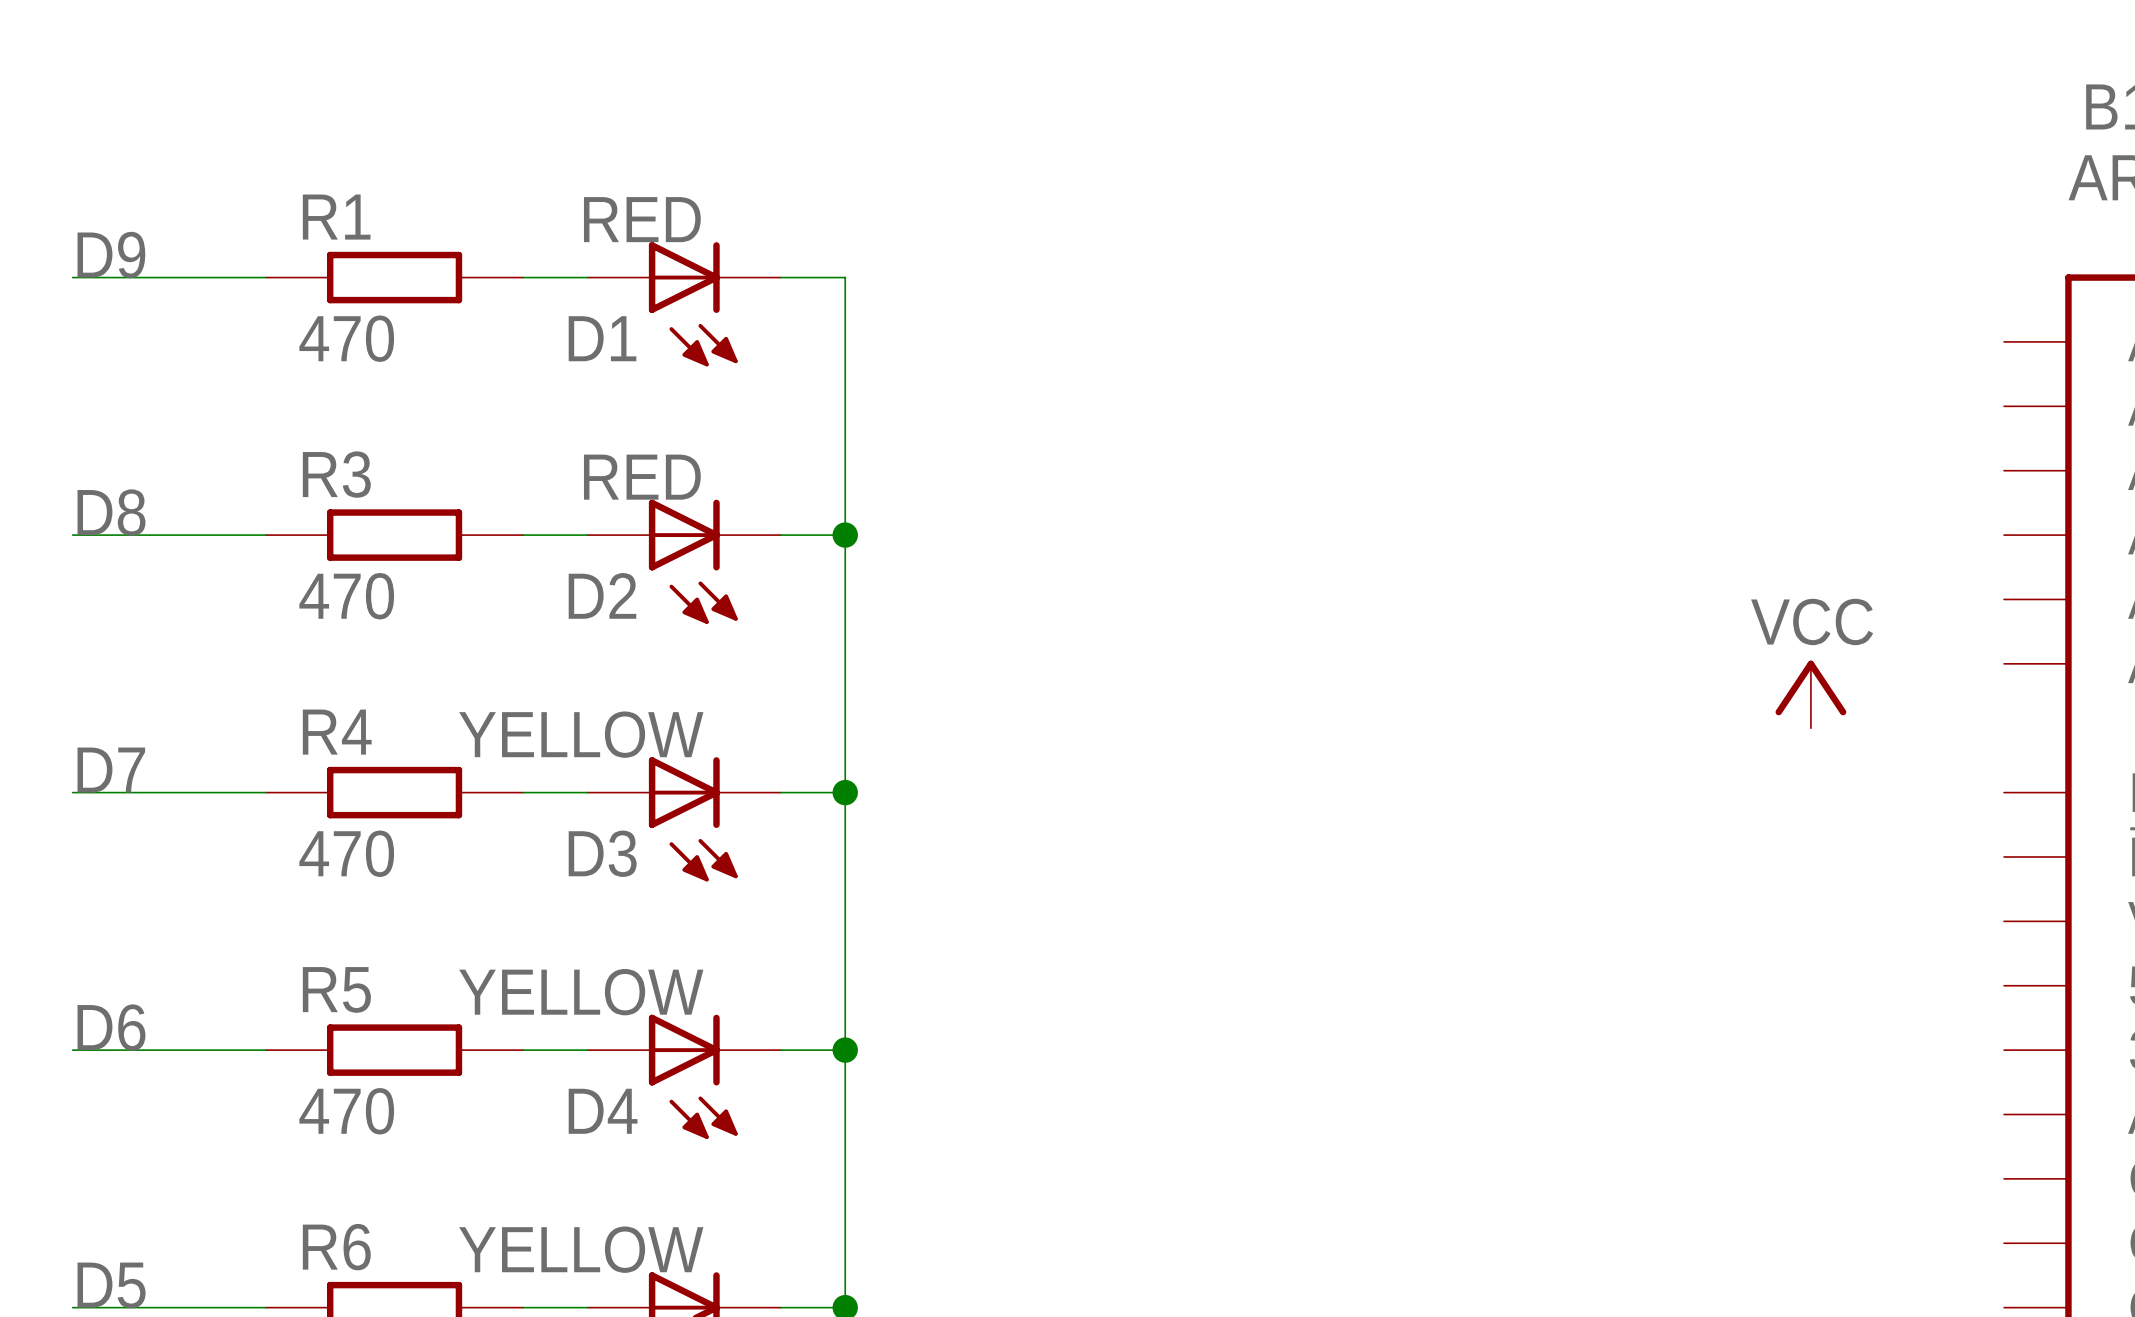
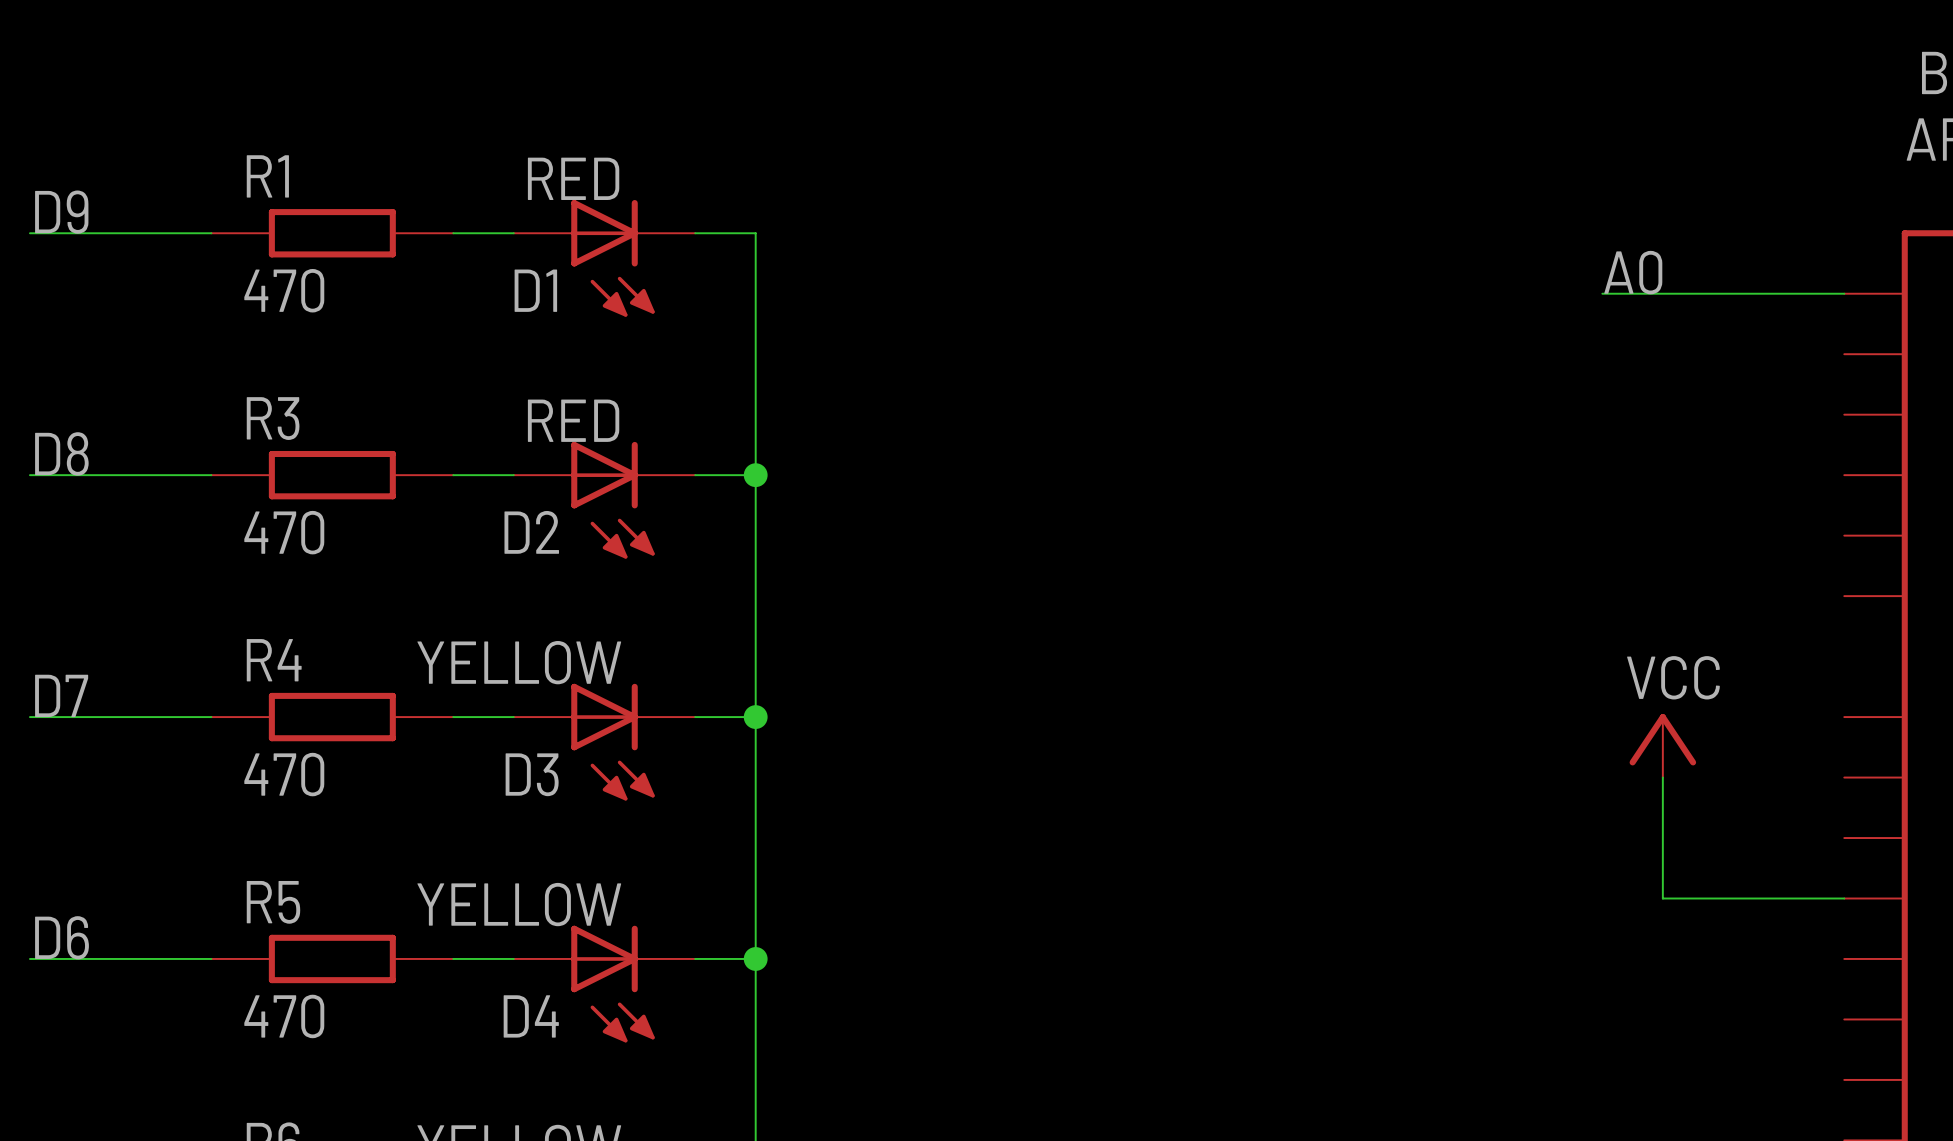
label: none -> A0 (1633, 272)
wire: none -> (1602, 293) (1844, 293)
power symbol position: VCC (1810, 694) -> VCC (1662, 745)
wire: none -> (1662, 777) (1662, 898) (1844, 898)

